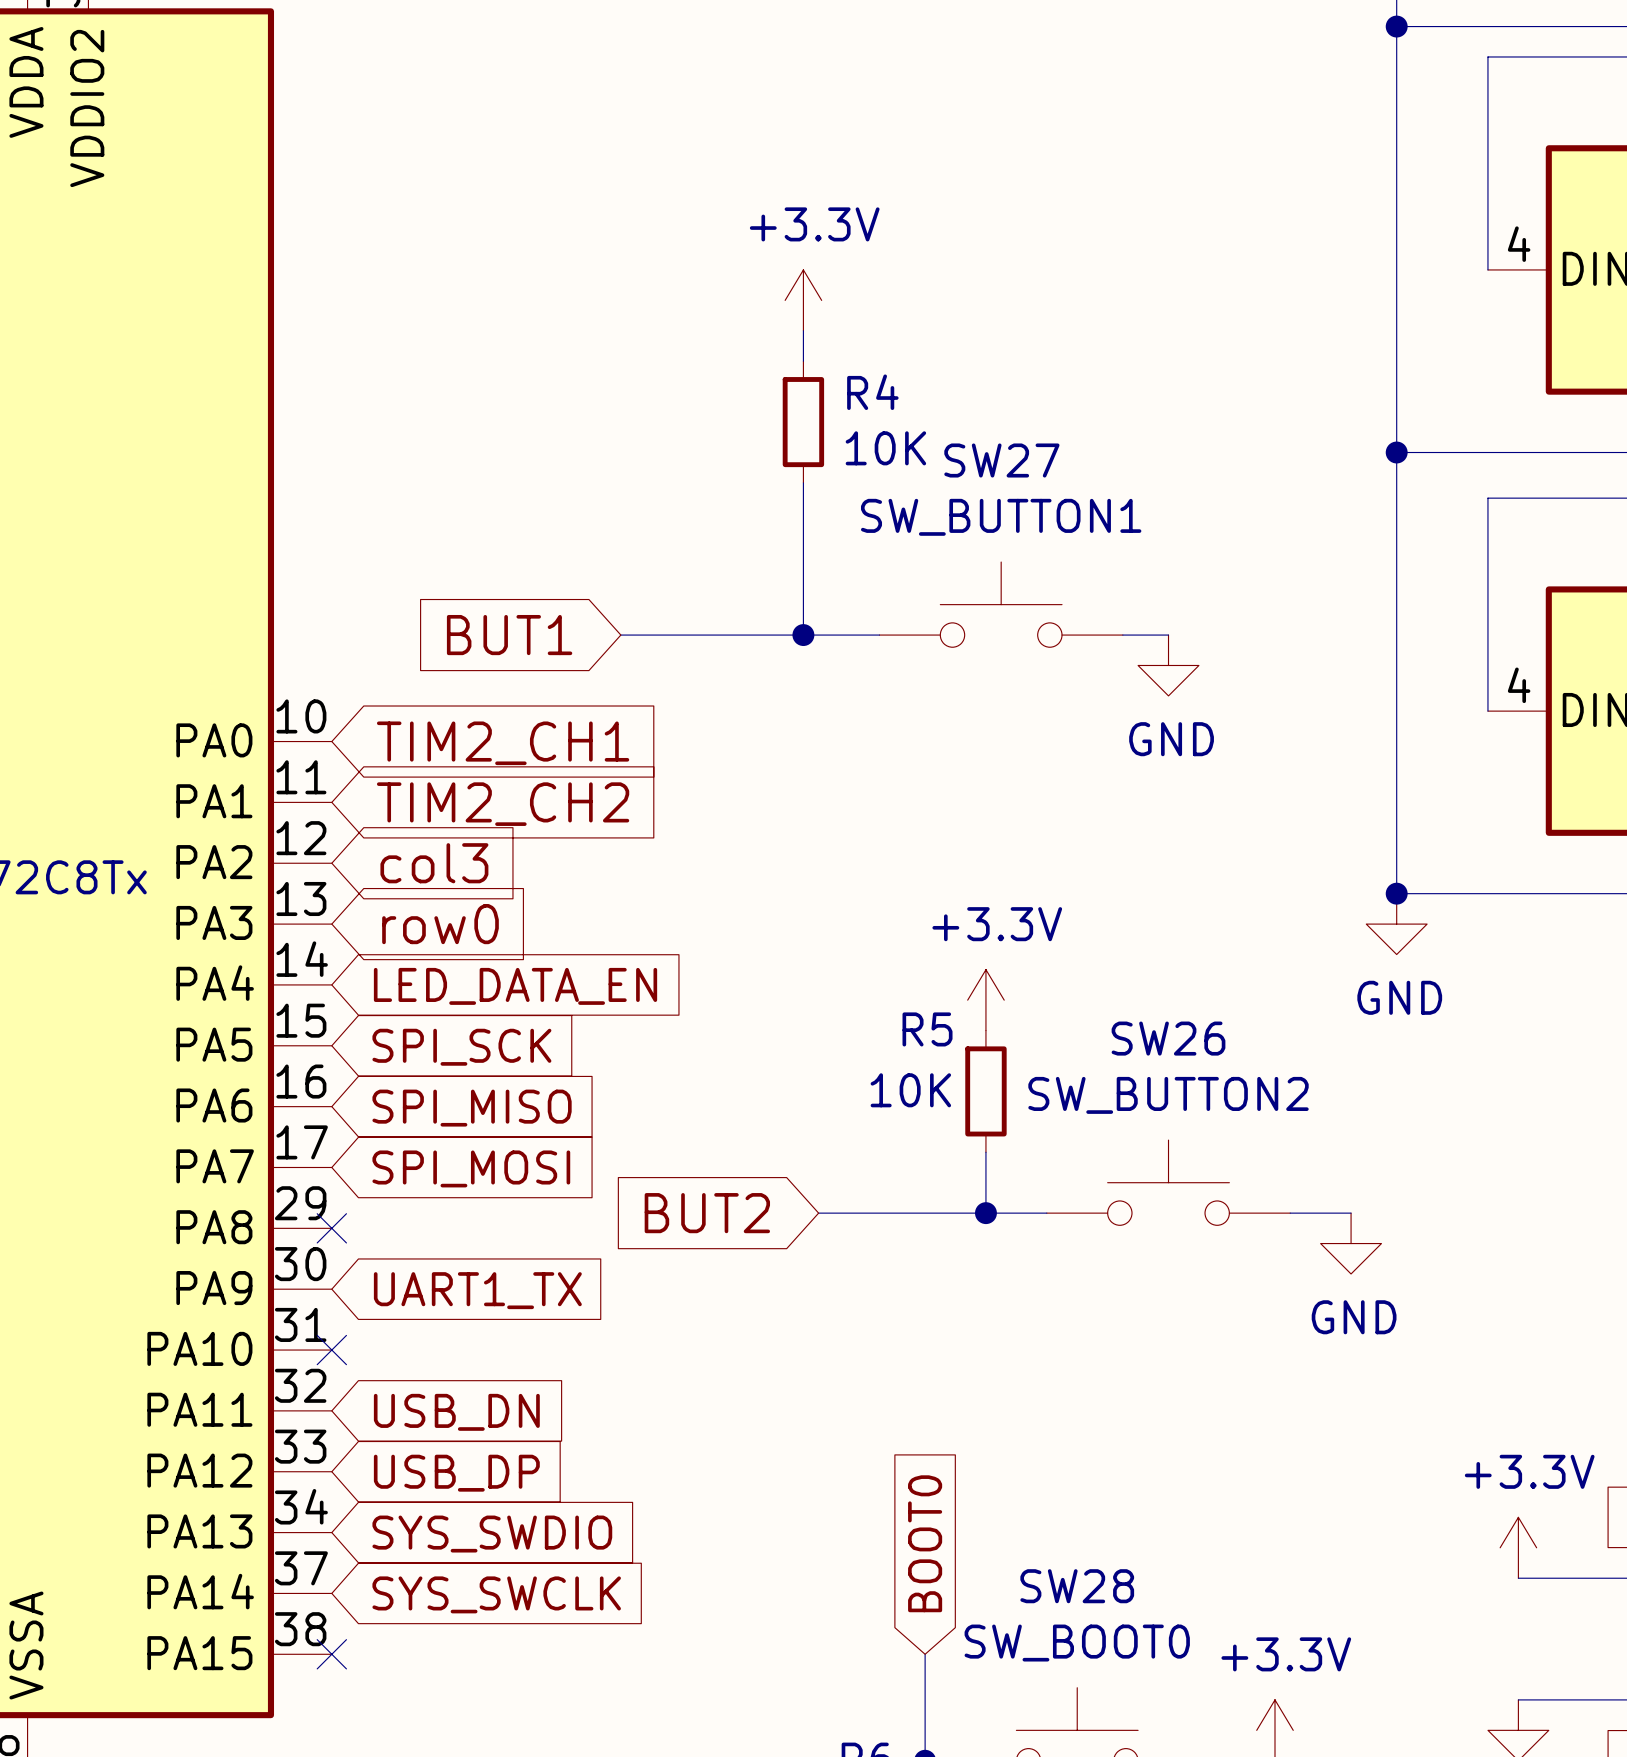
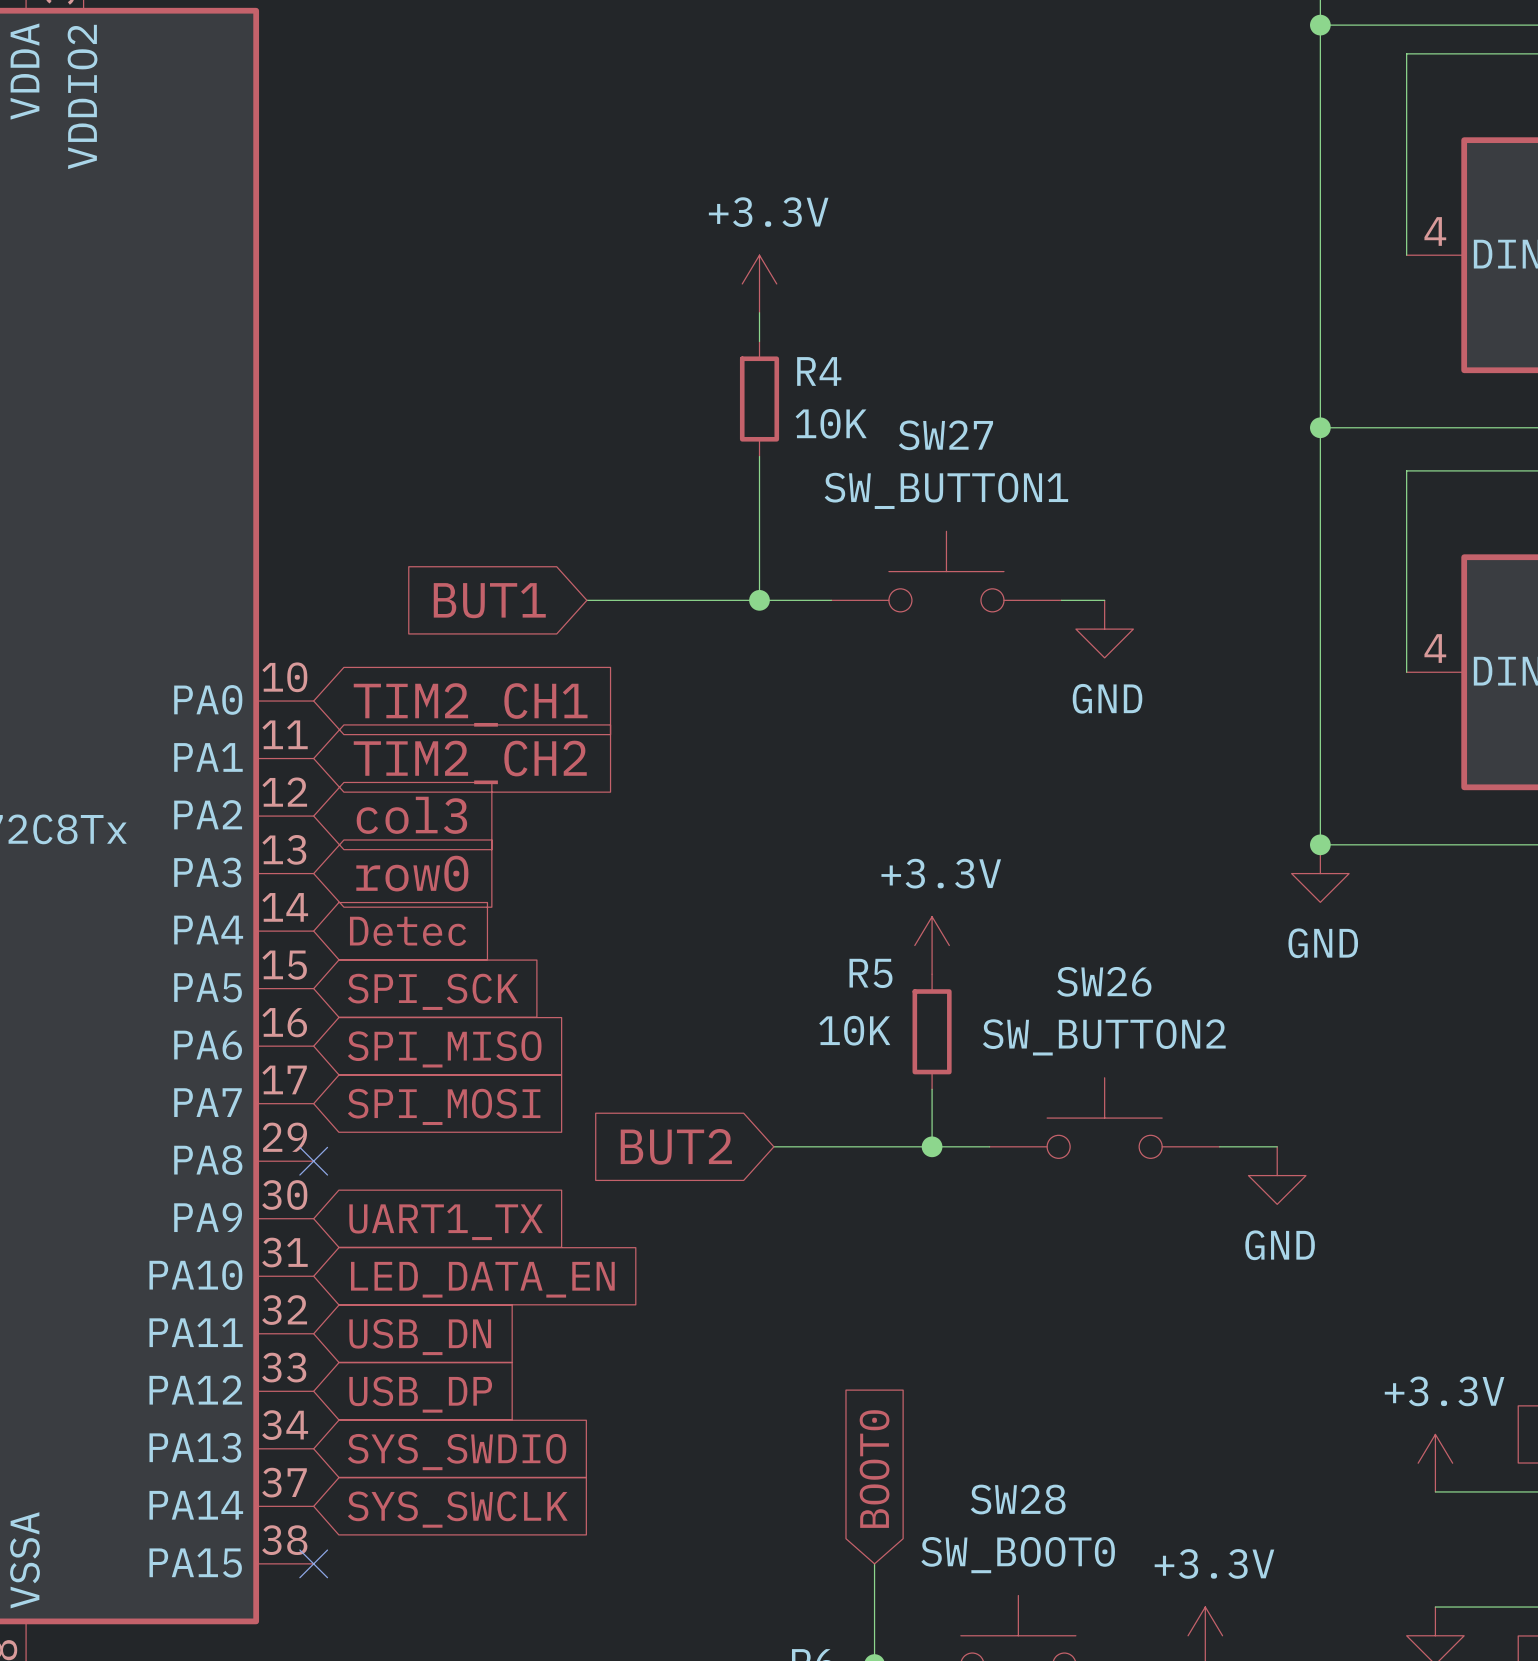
global label: LED_DATA_EN (515, 986) -> Detec (408, 931)
no-connect mark: (331, 1350) -> none
global label: none -> LED_DATA_EN (482, 1279)

